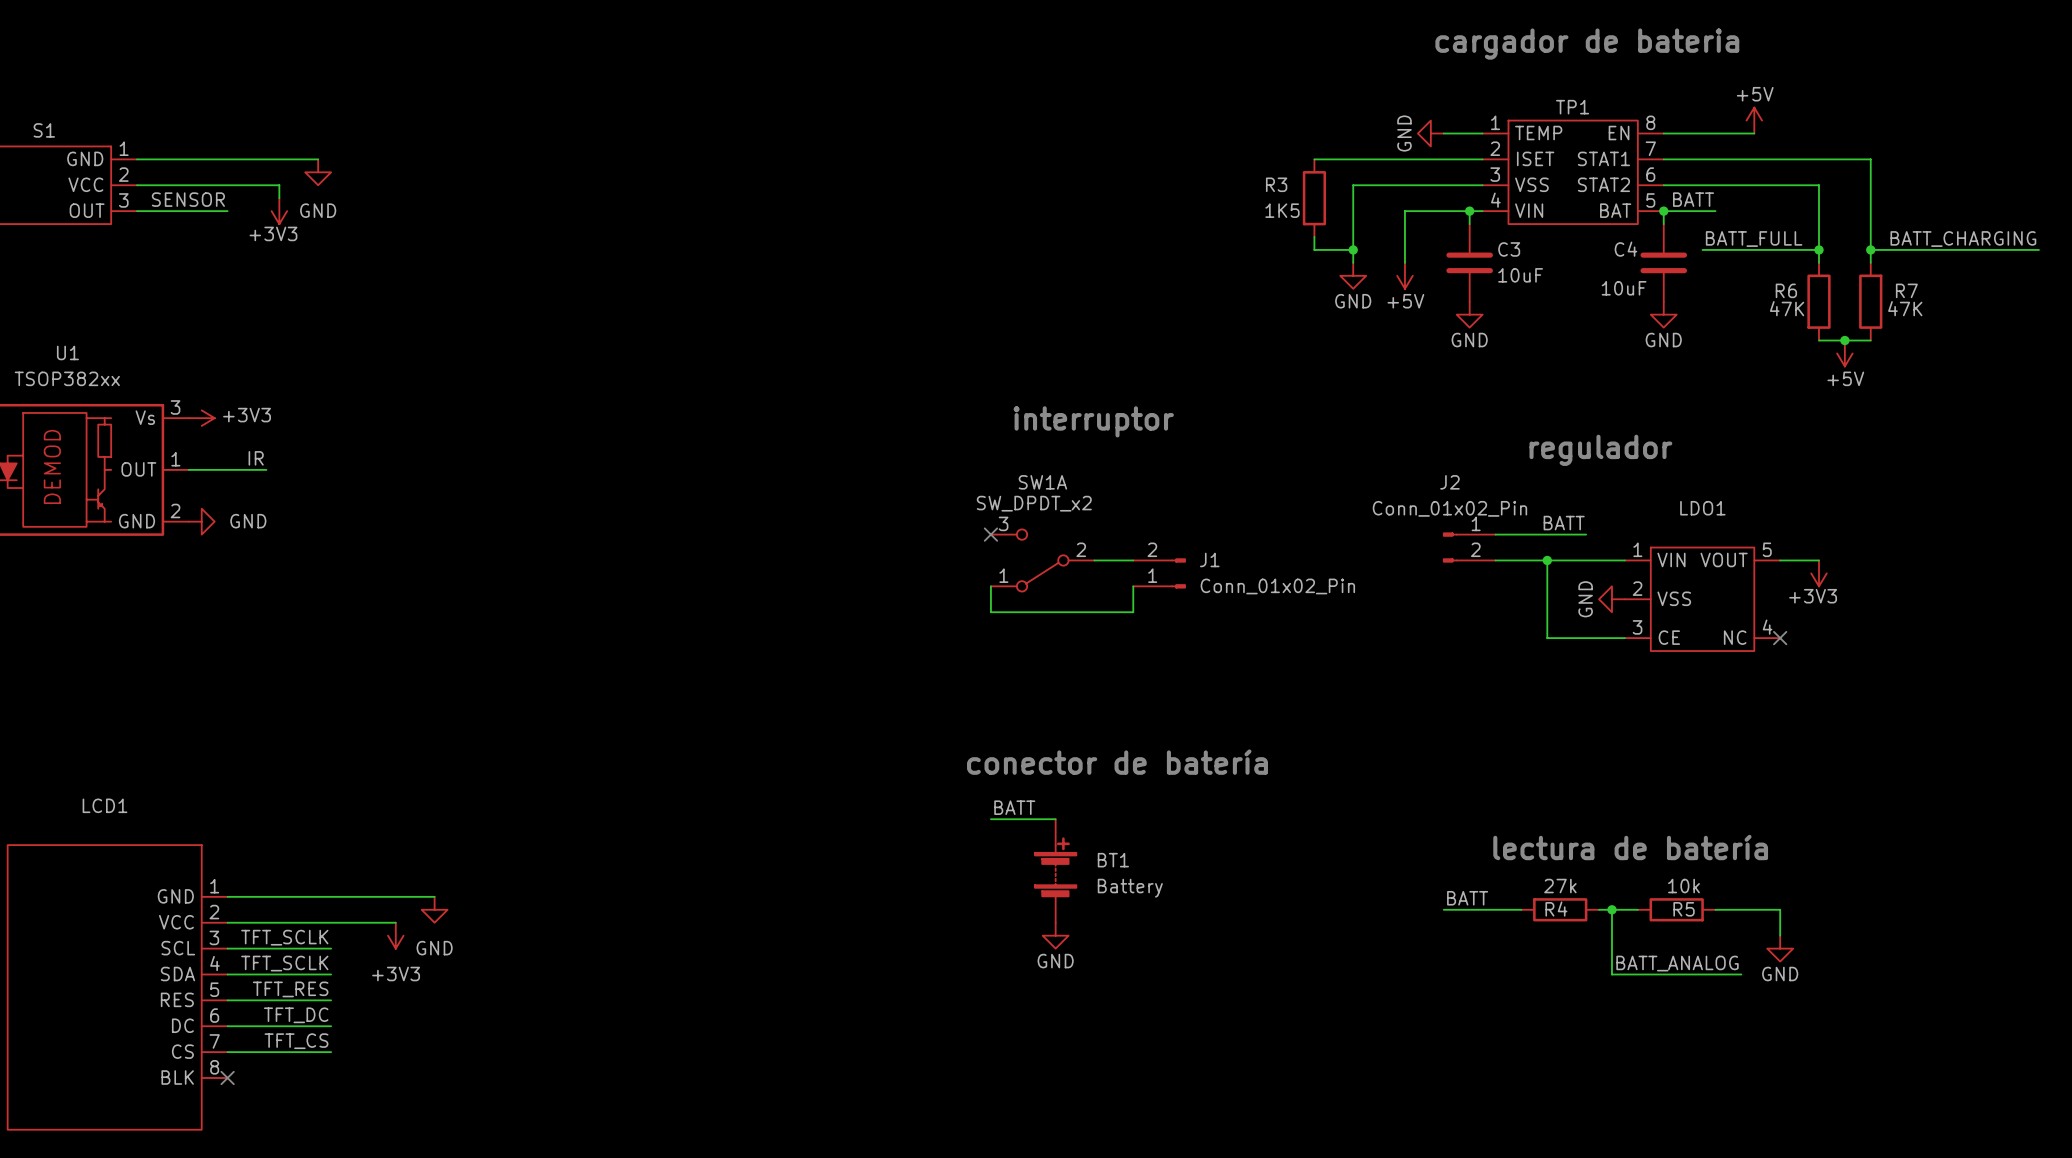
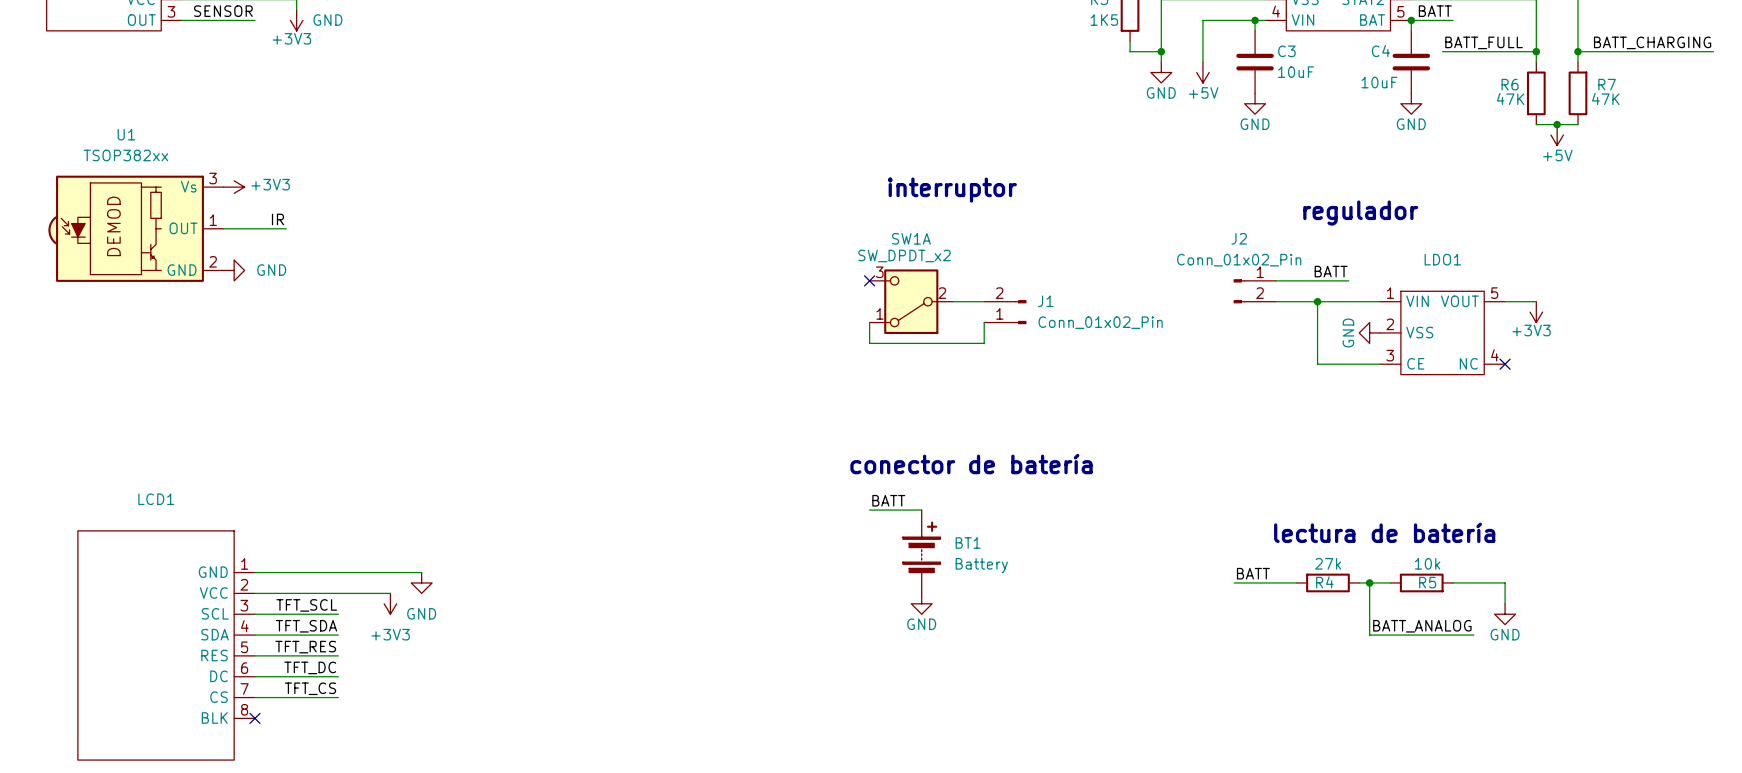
SW1A symbol: [990, 529, 1095, 592] -> [869, 269, 953, 335]
BT1 symbol: [1034, 819, 1077, 923] -> [902, 510, 941, 594]
label: TFT_SCLK (284, 937) -> TFT_SCL (306, 605)
label: TFT_SCLK (284, 963) -> TFT_SDA (306, 626)

